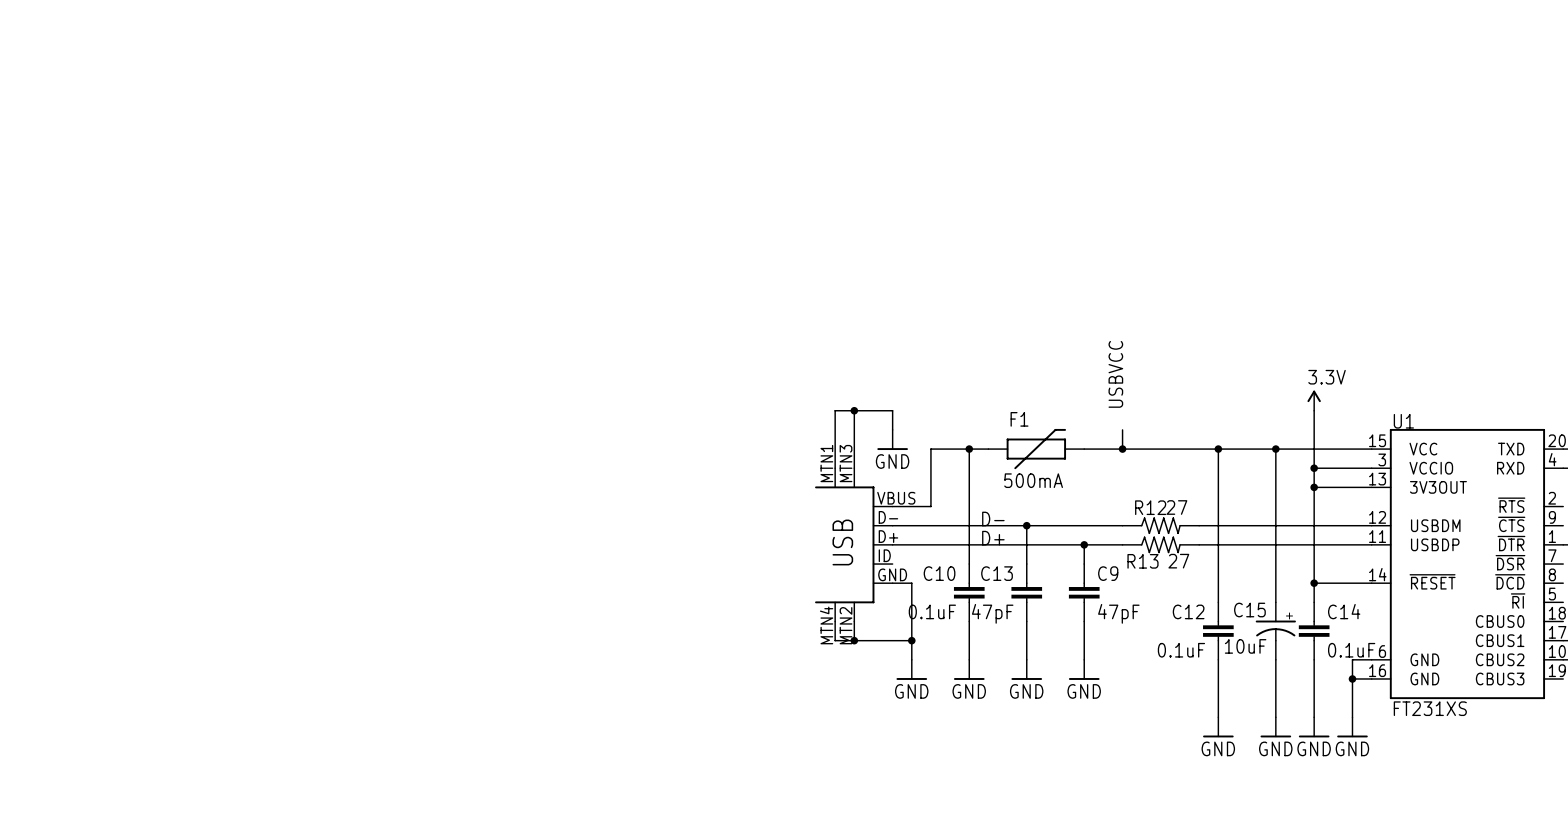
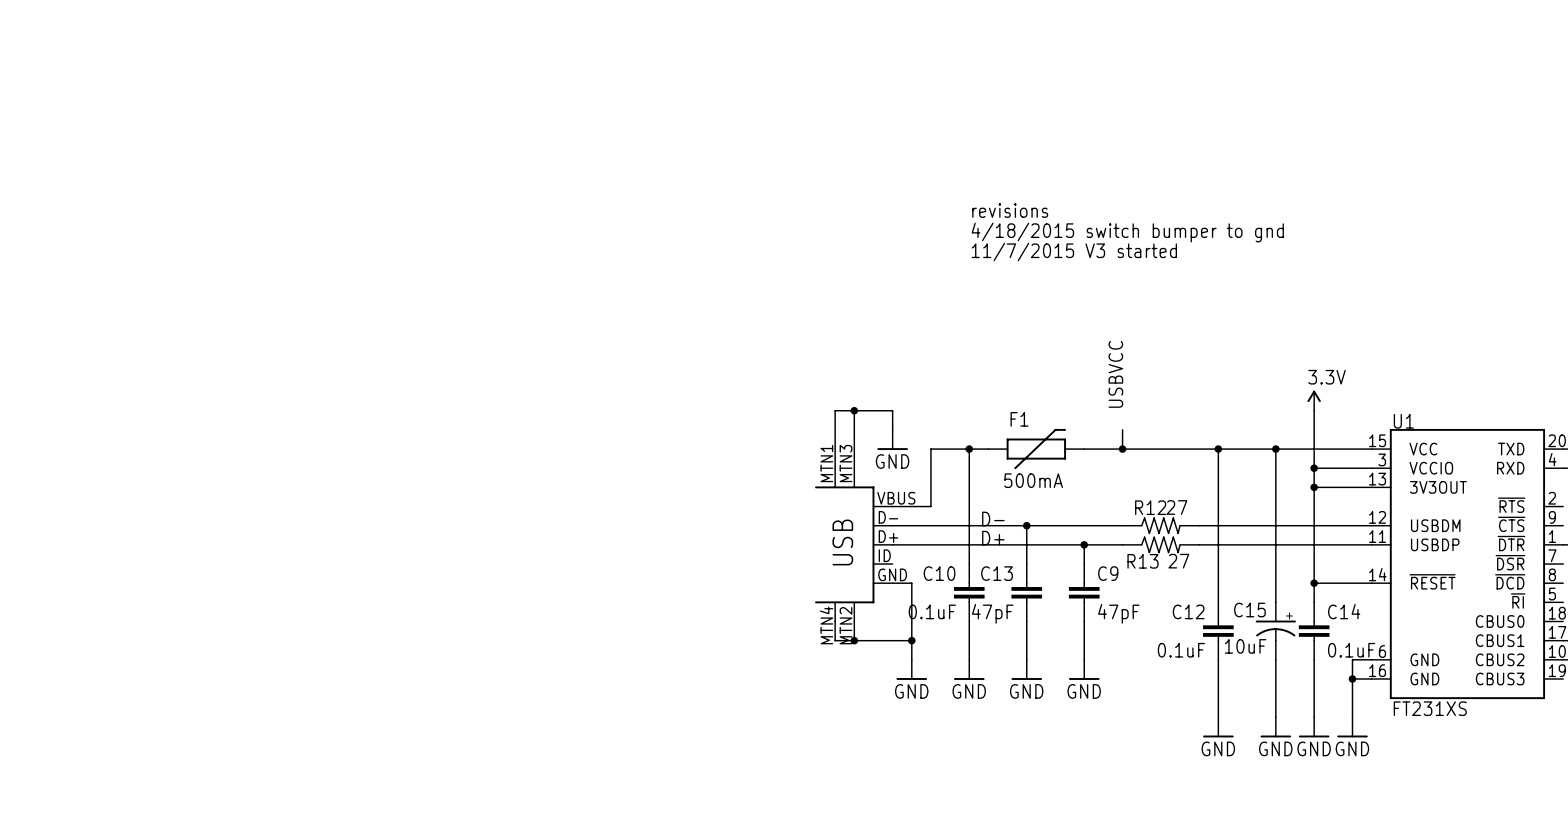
text: none -> revisions (1010, 210)
text: none -> 4/18/2015 switch bumper to gnd (1127, 232)
text: none -> 11/7/2015 V3 started (1074, 252)

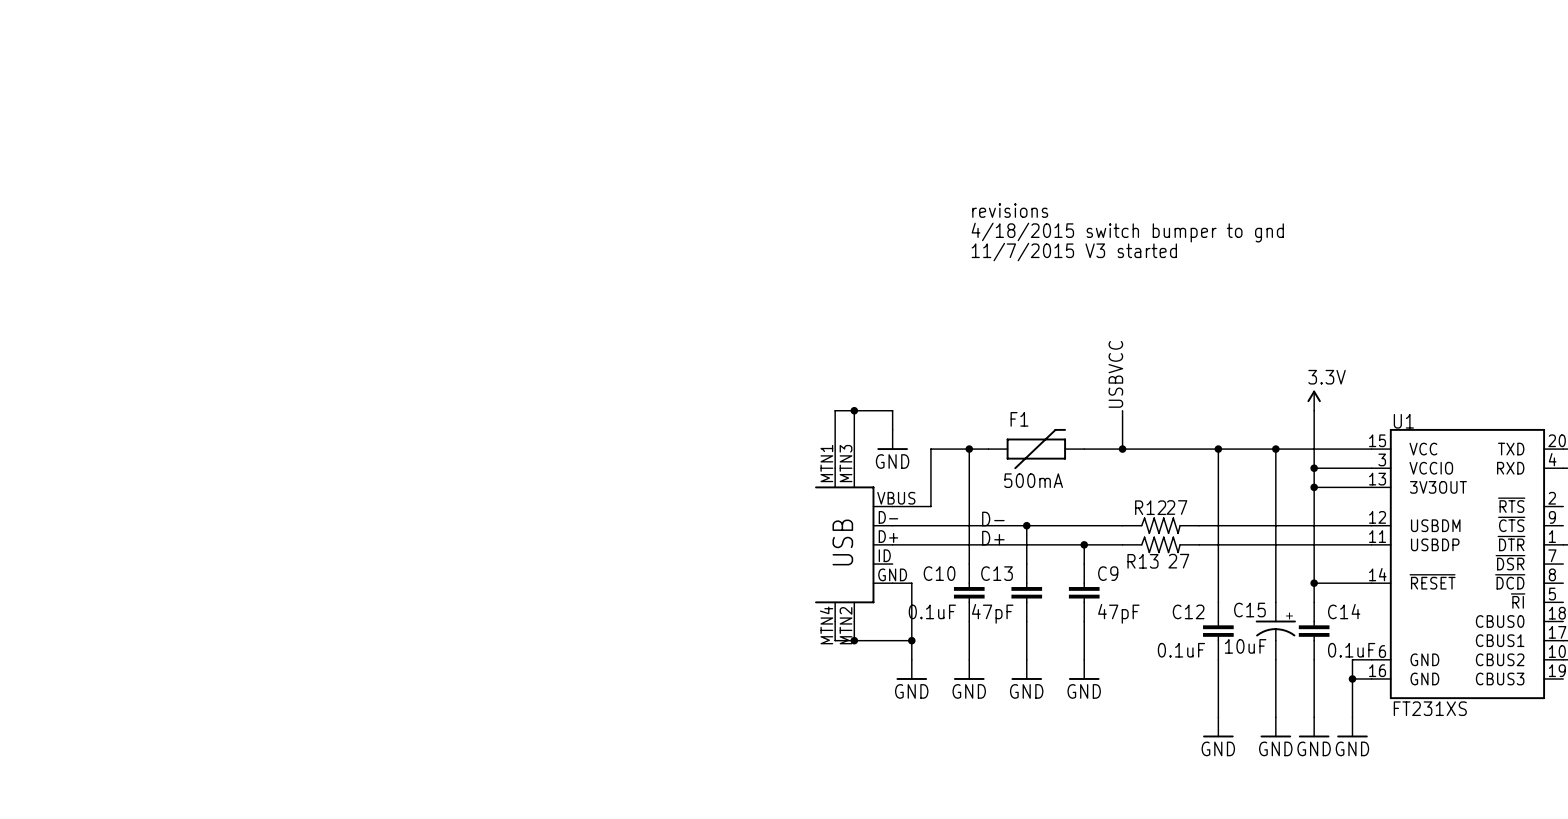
wire: none -> (1122, 410) (1122, 429)

